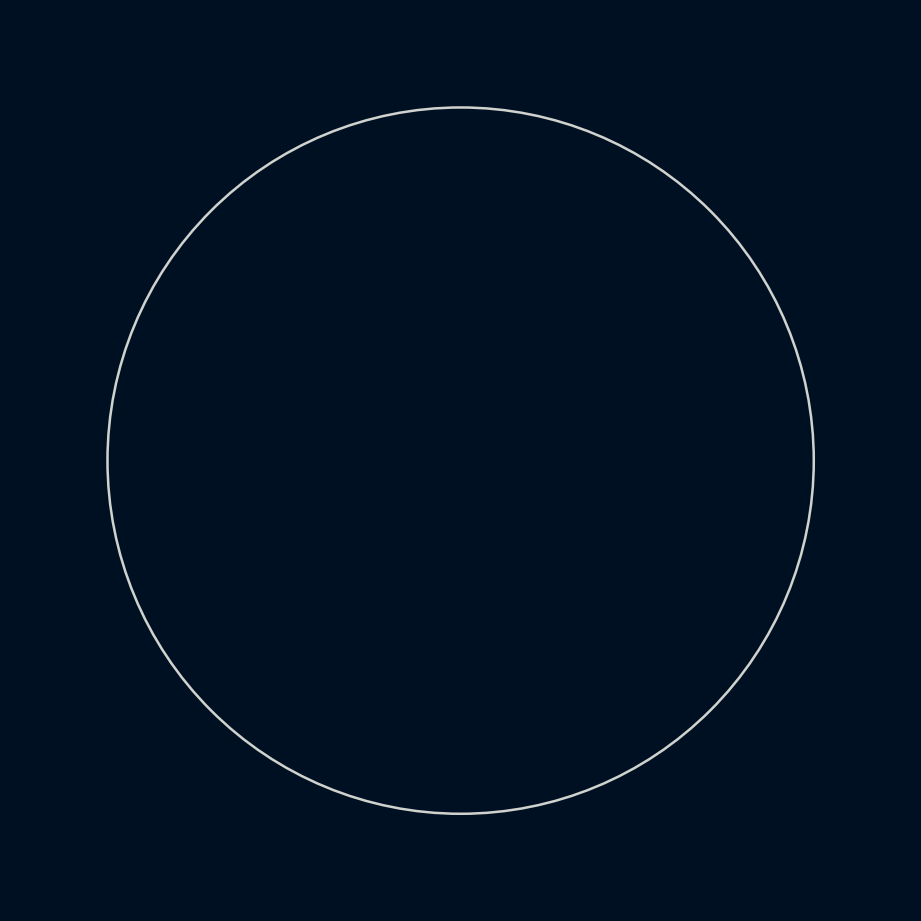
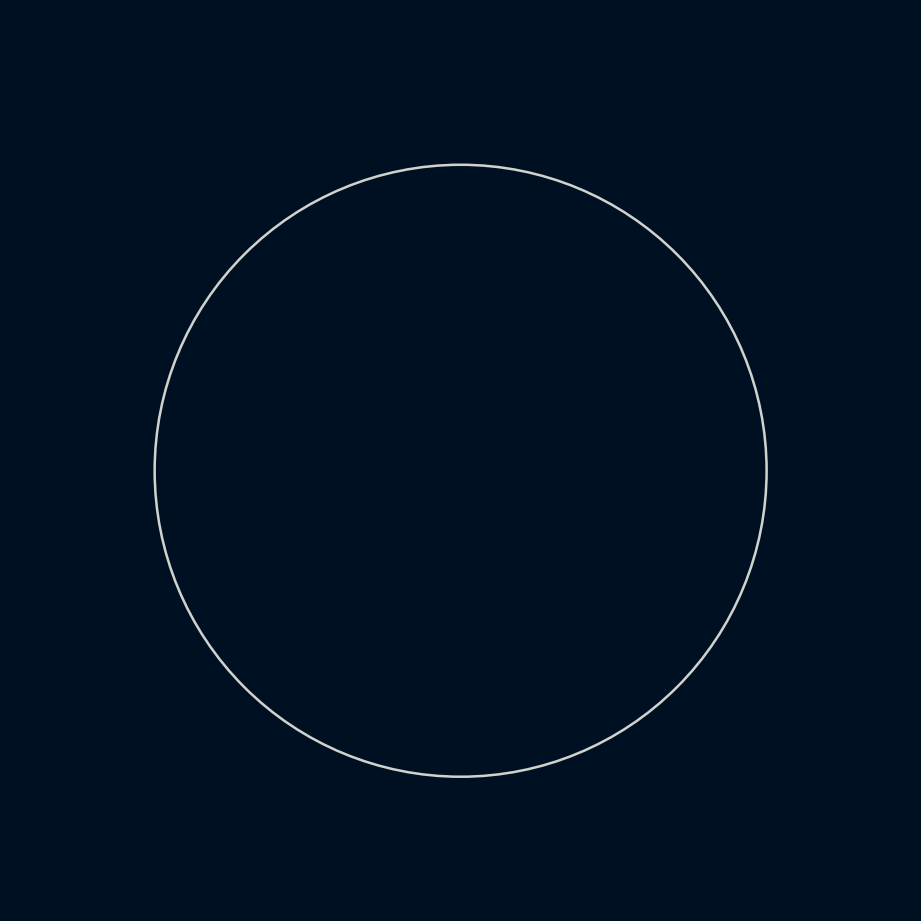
round board edge size: [106, 106, 816, 816] -> [153, 163, 768, 778]

